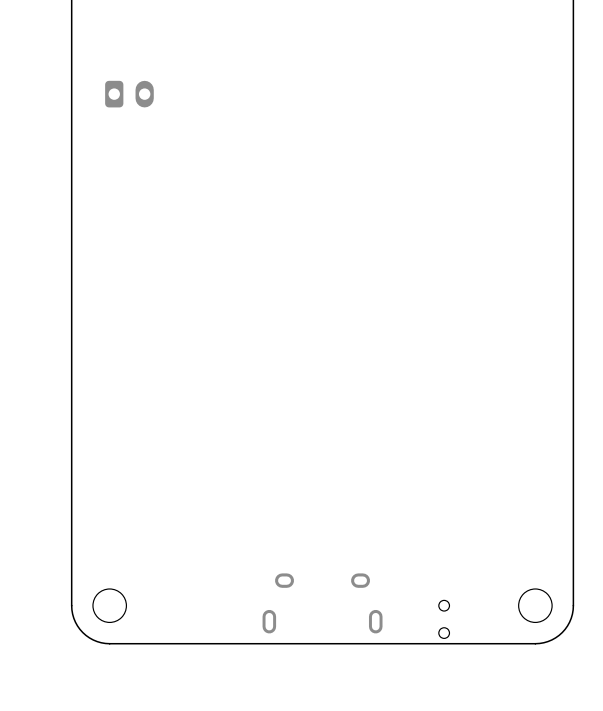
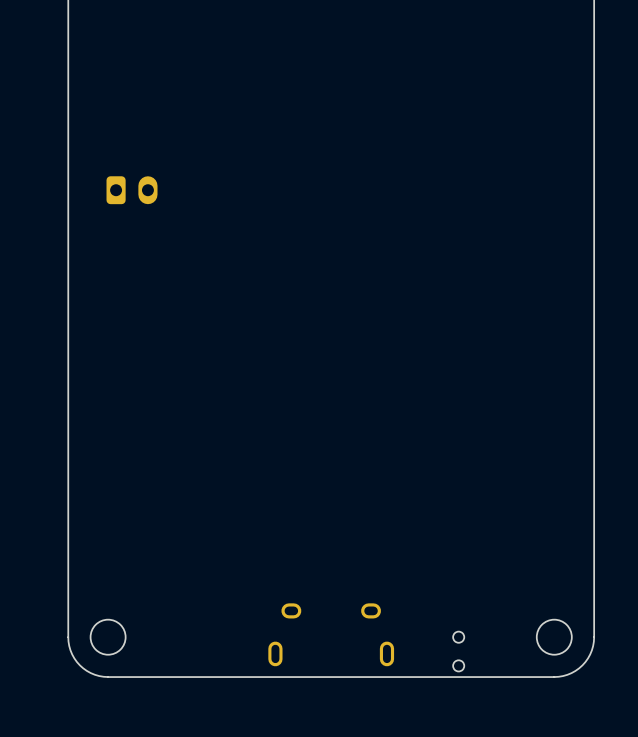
part position: (129, 94) -> (132, 190)

